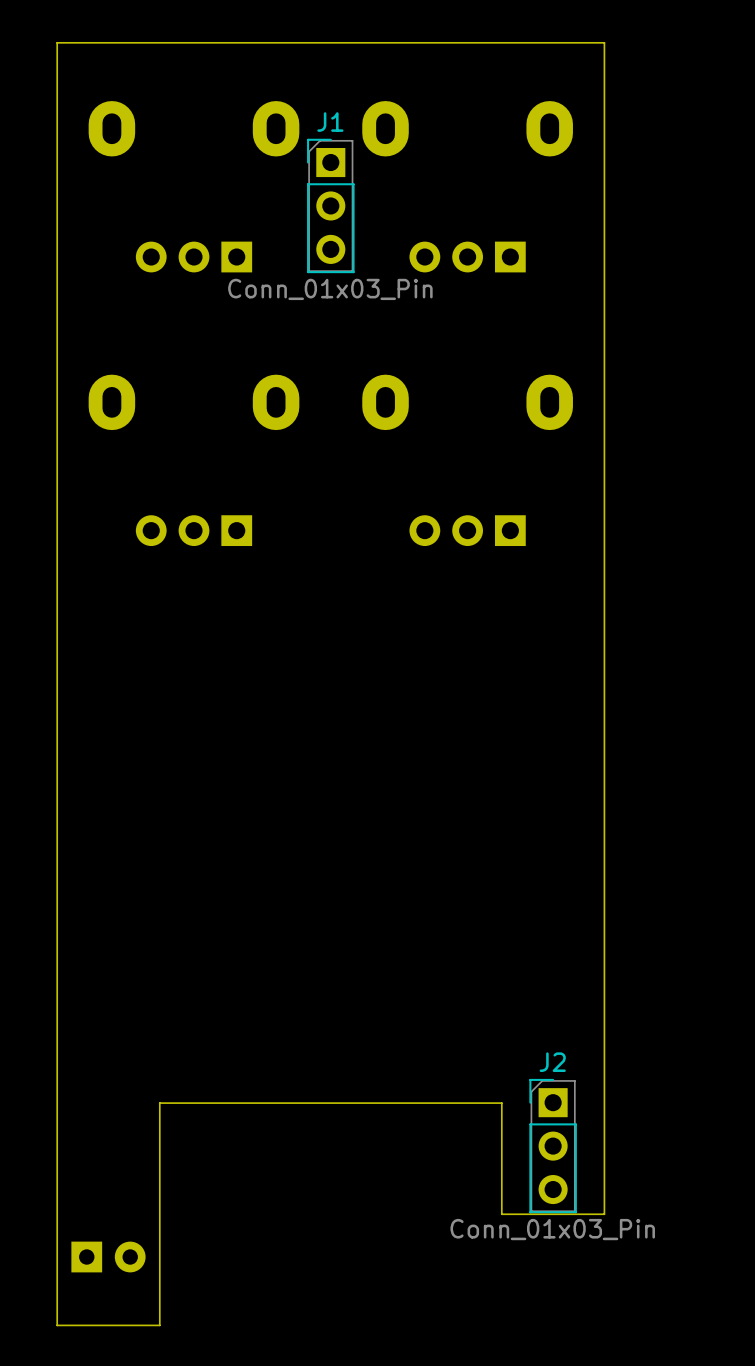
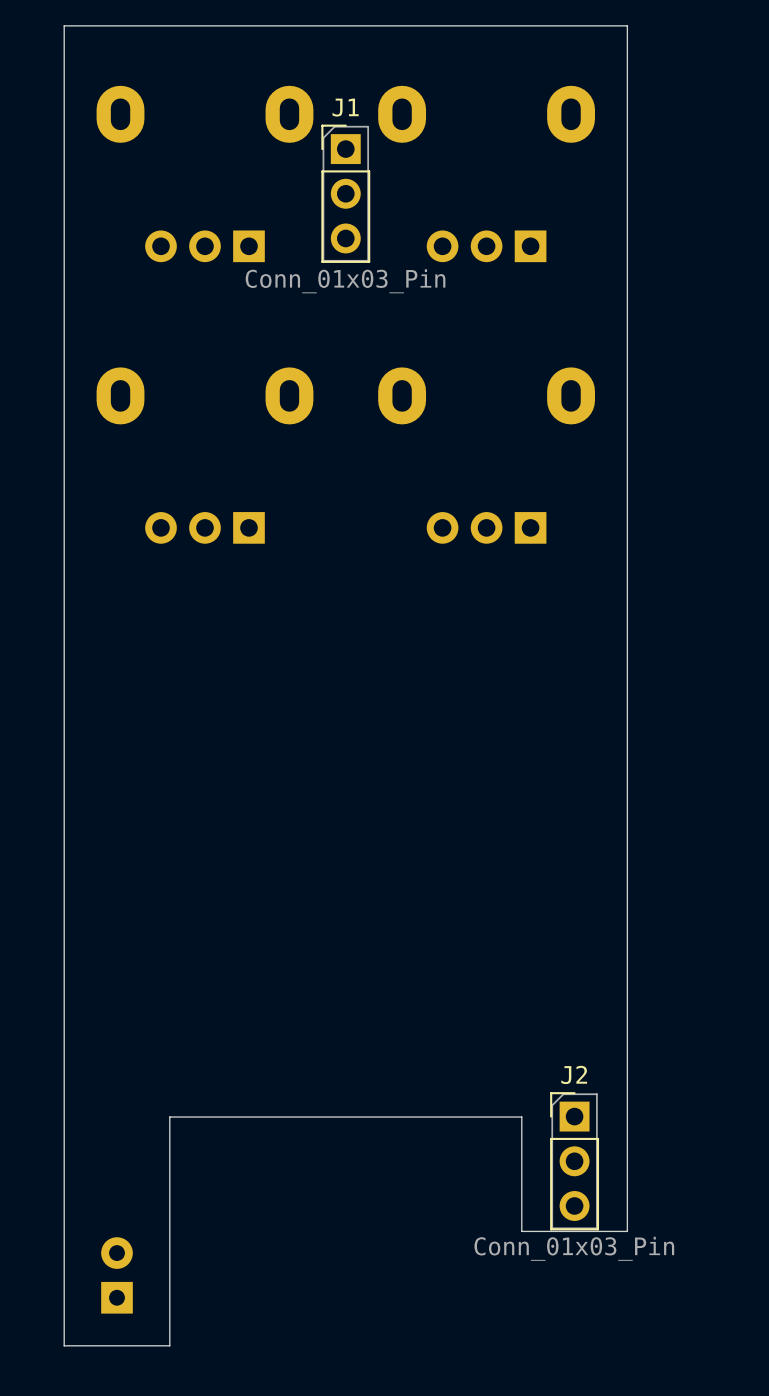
part rotation: 0° (108, 1257) -> 90° counterclockwise (117, 1275)

